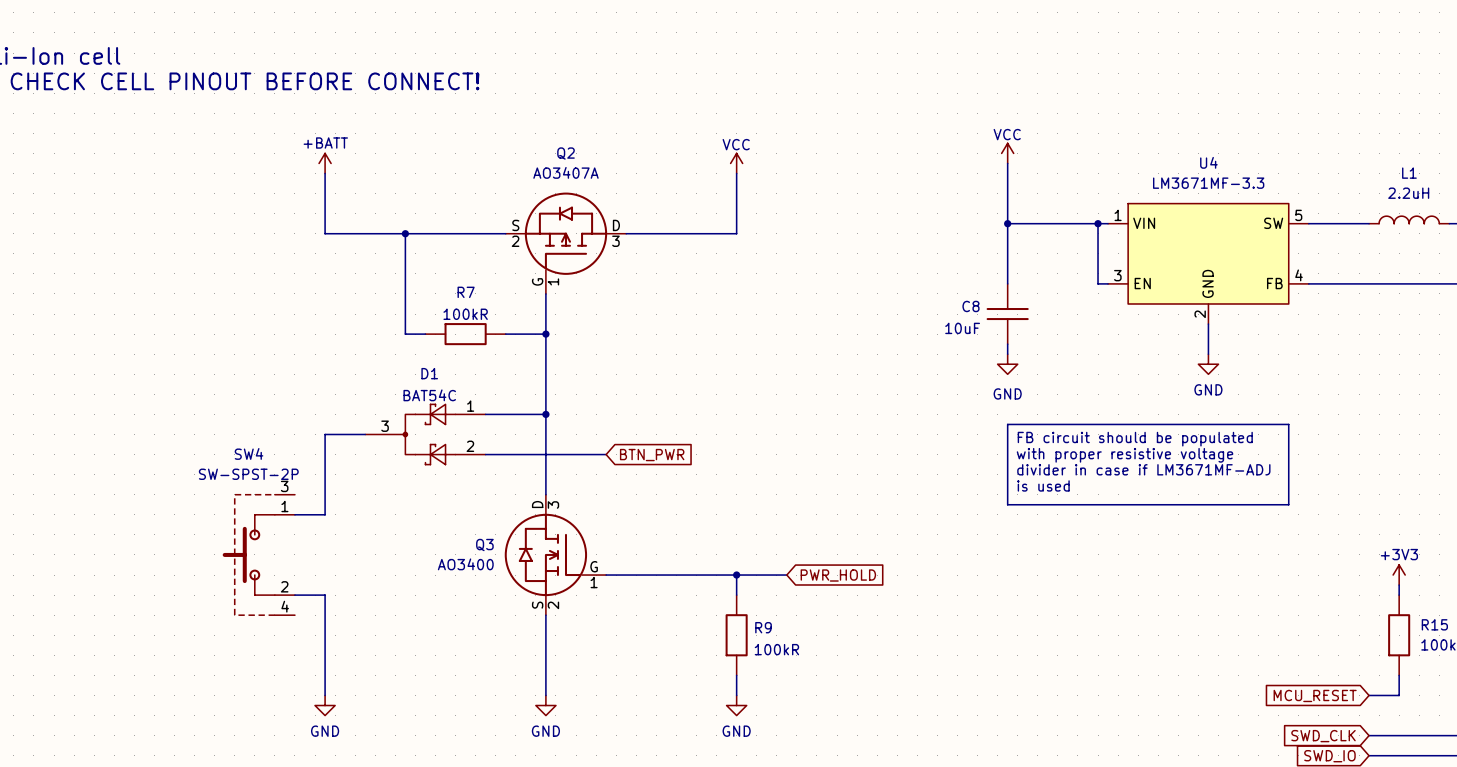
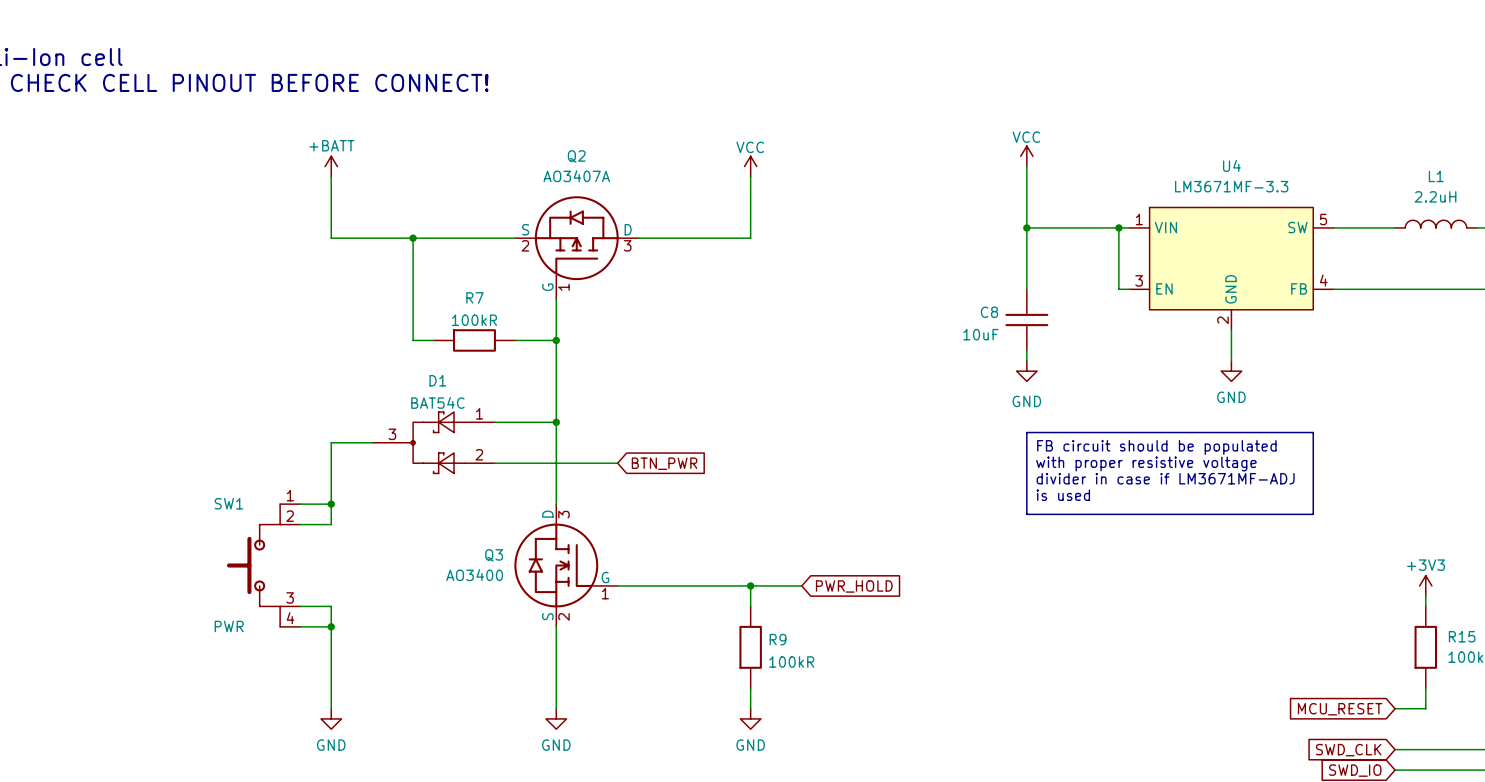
wire: none -> (300, 504) (331, 504)
junction: none -> (331, 504)
SW4: SW-SPST-2P (258, 554) -> none
SW1: none -> (263, 565)
wire: none -> (300, 626) (331, 626)
junction: none -> (331, 626)

